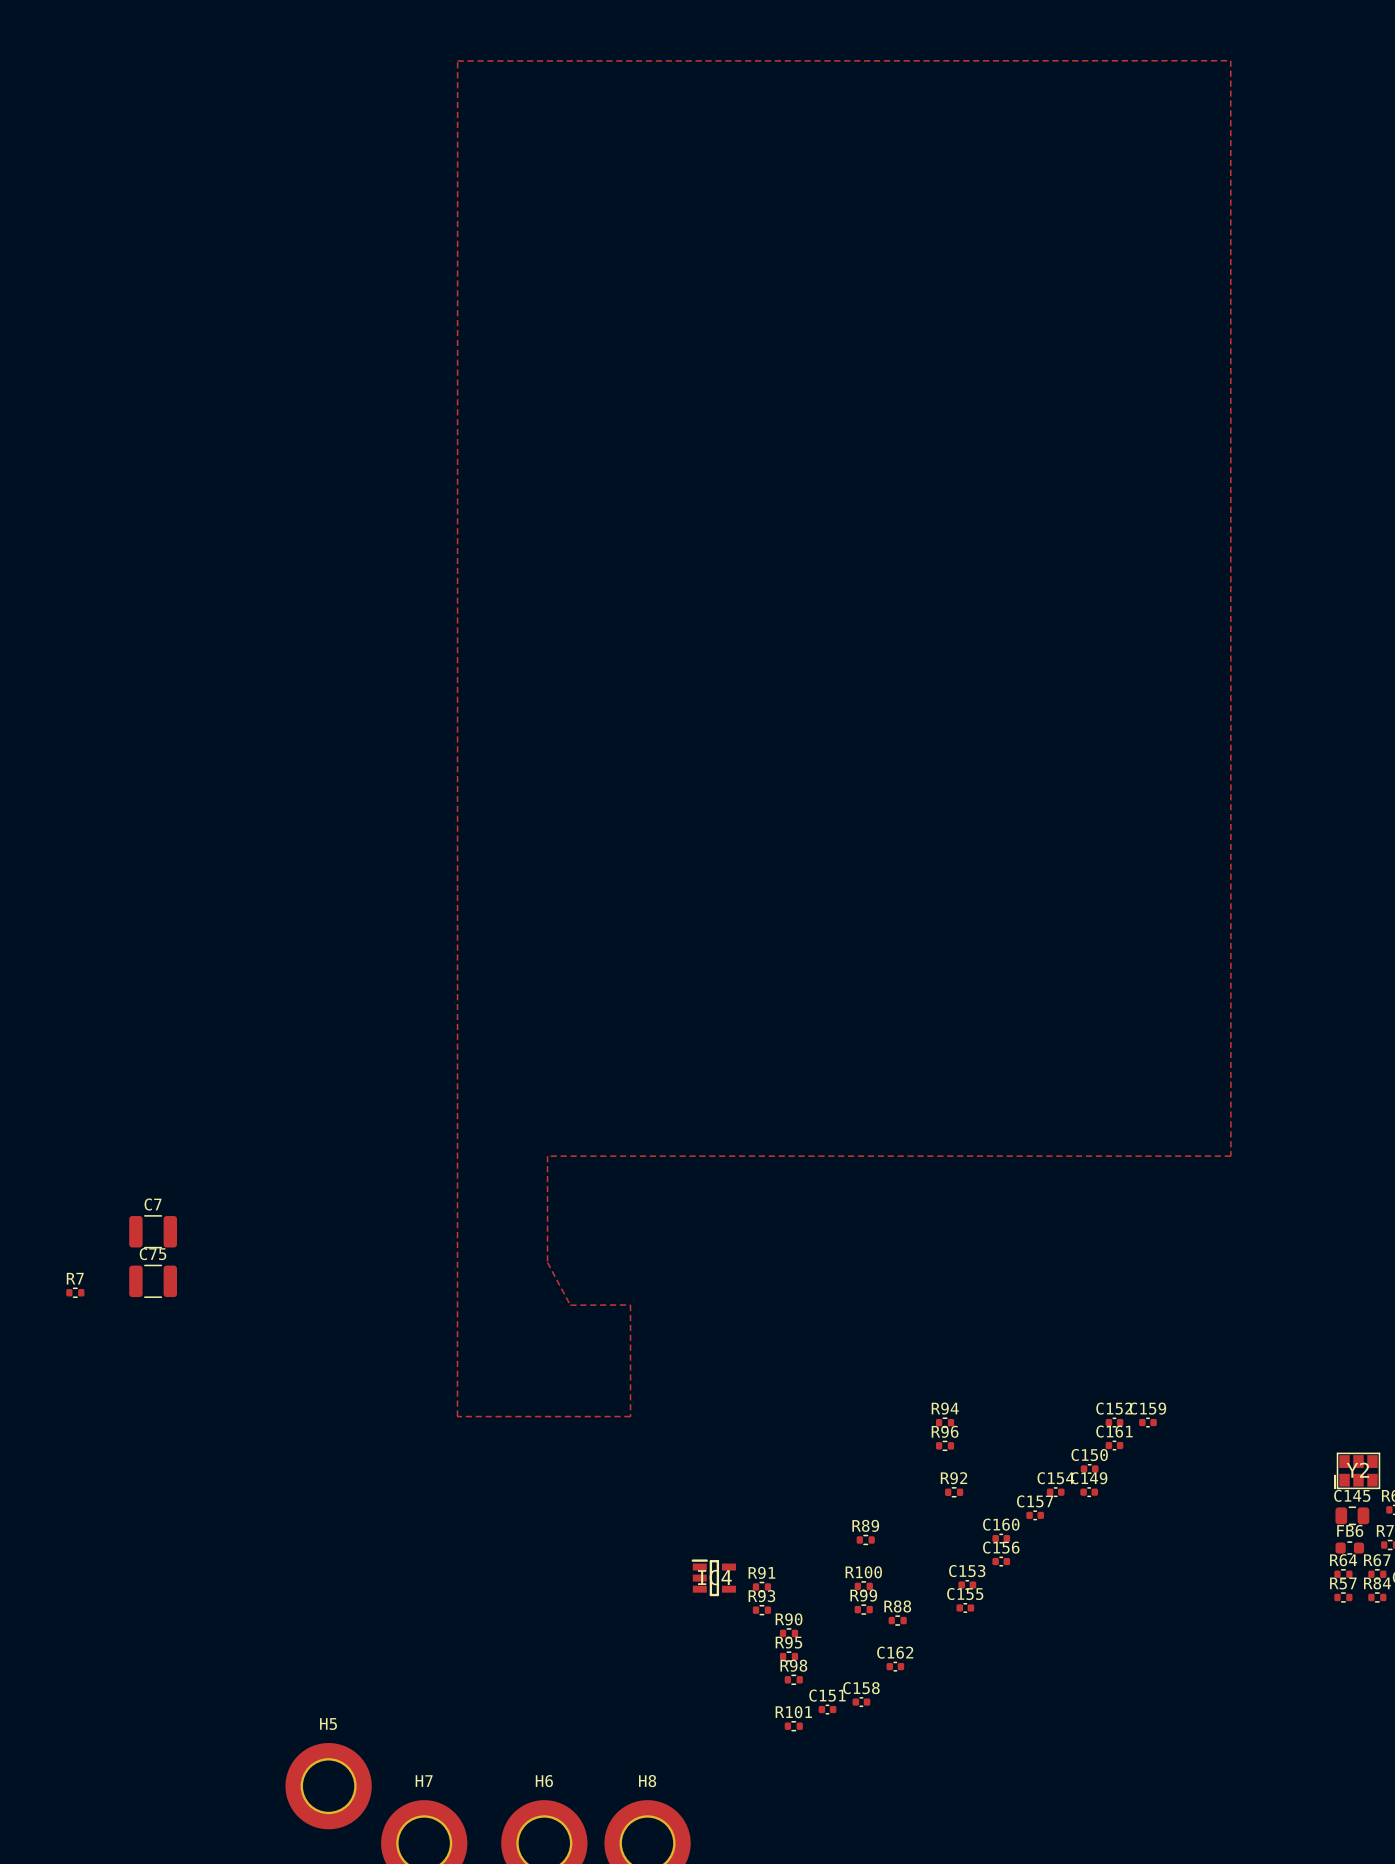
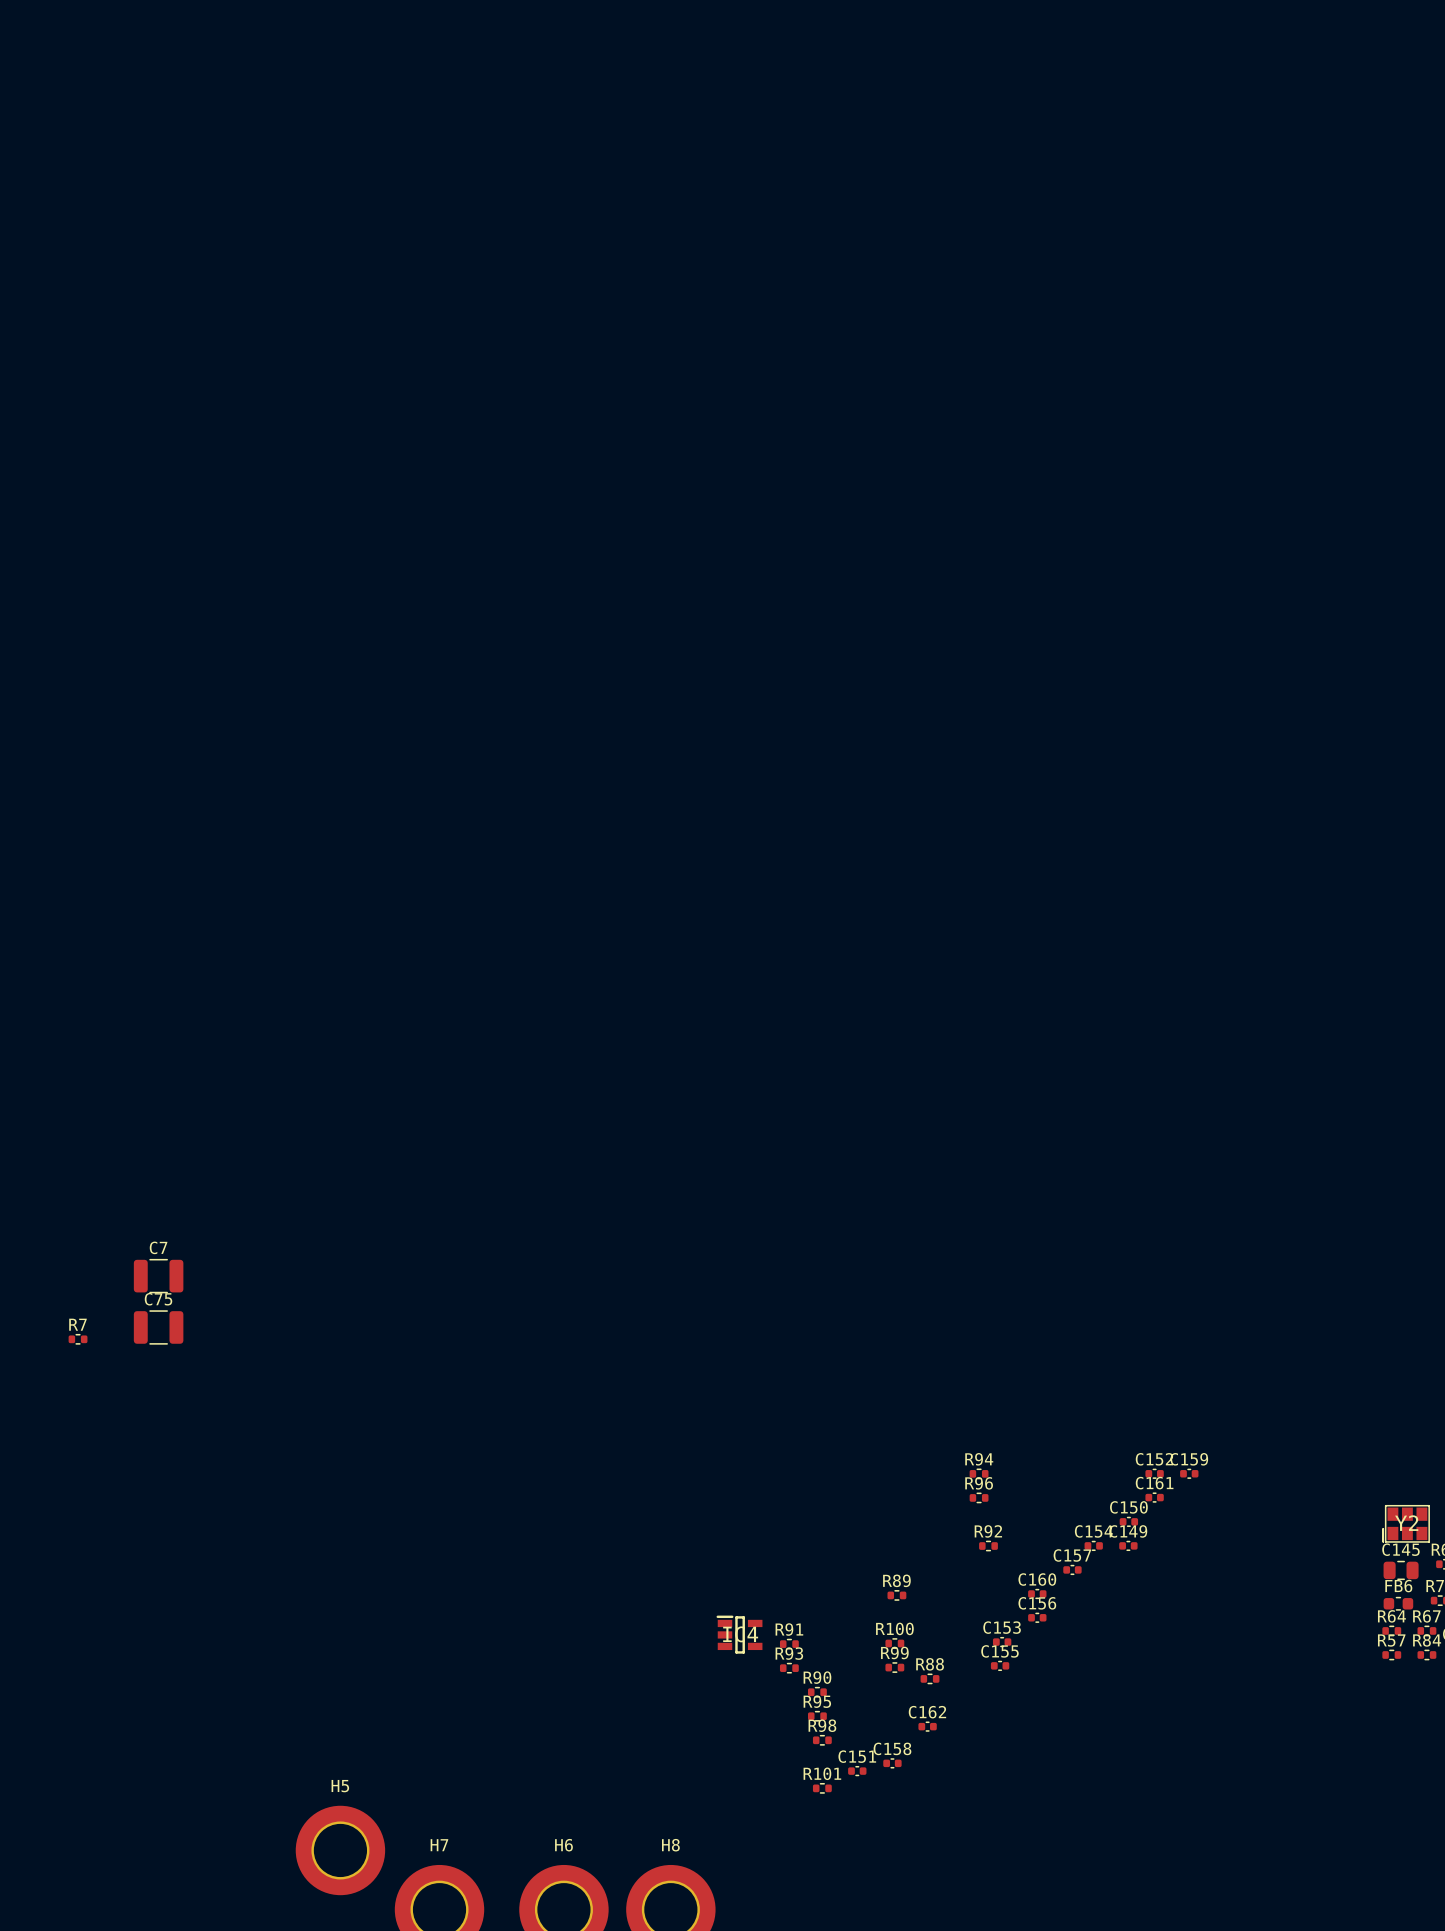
zone outline: (1230, 60) (457, 61) (457, 1416) (630, 1416) (630, 1304) (570, 1305) (547, 1262) (547, 1156) (1230, 1156) (1230, 60) -> none

